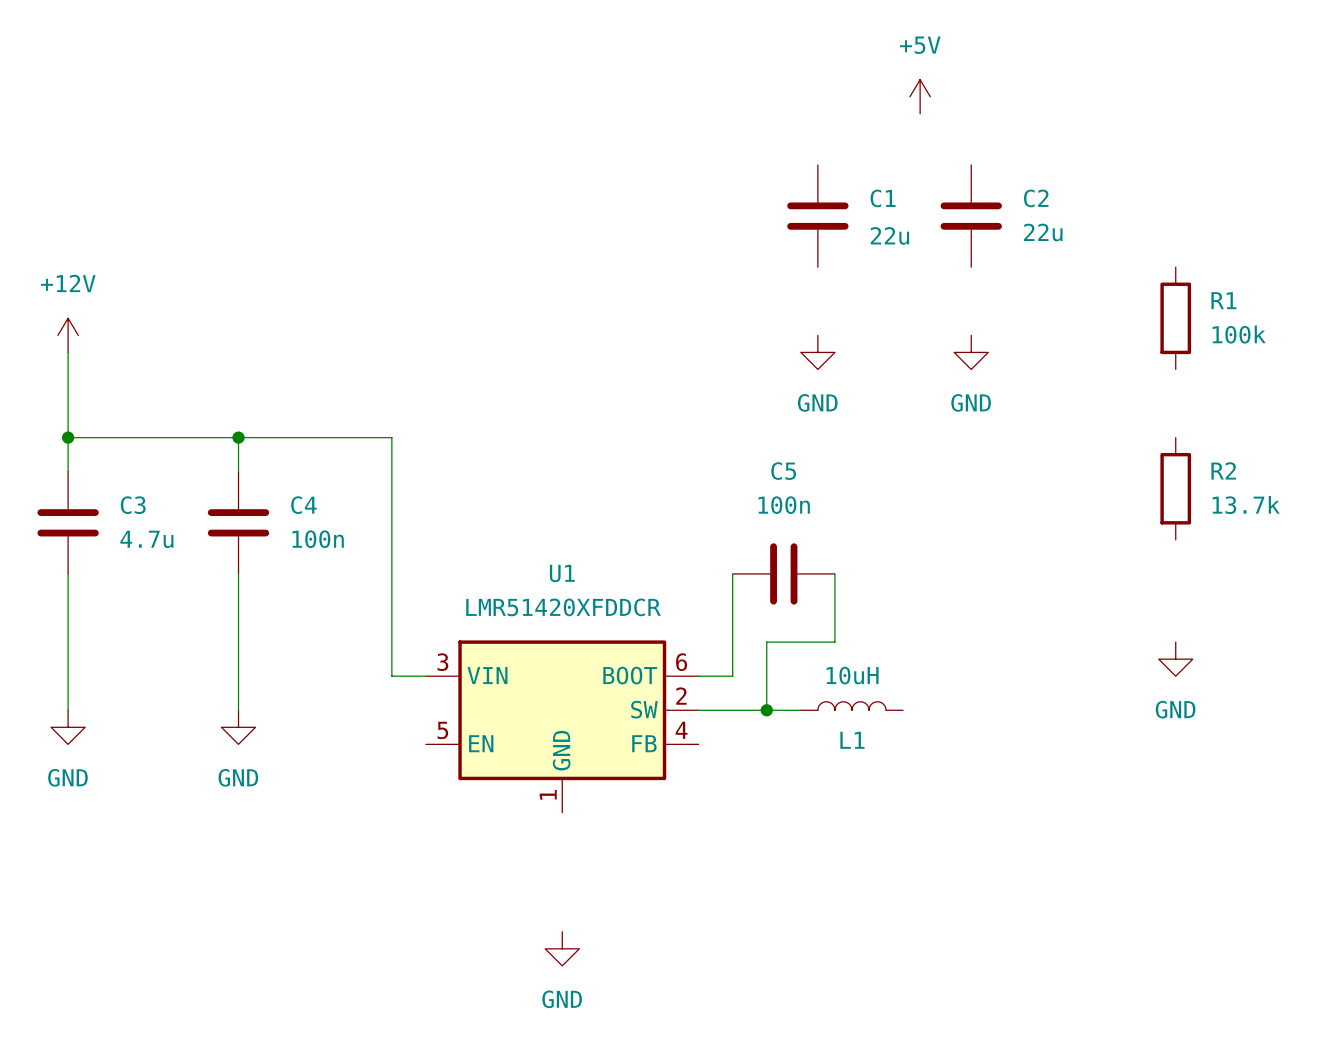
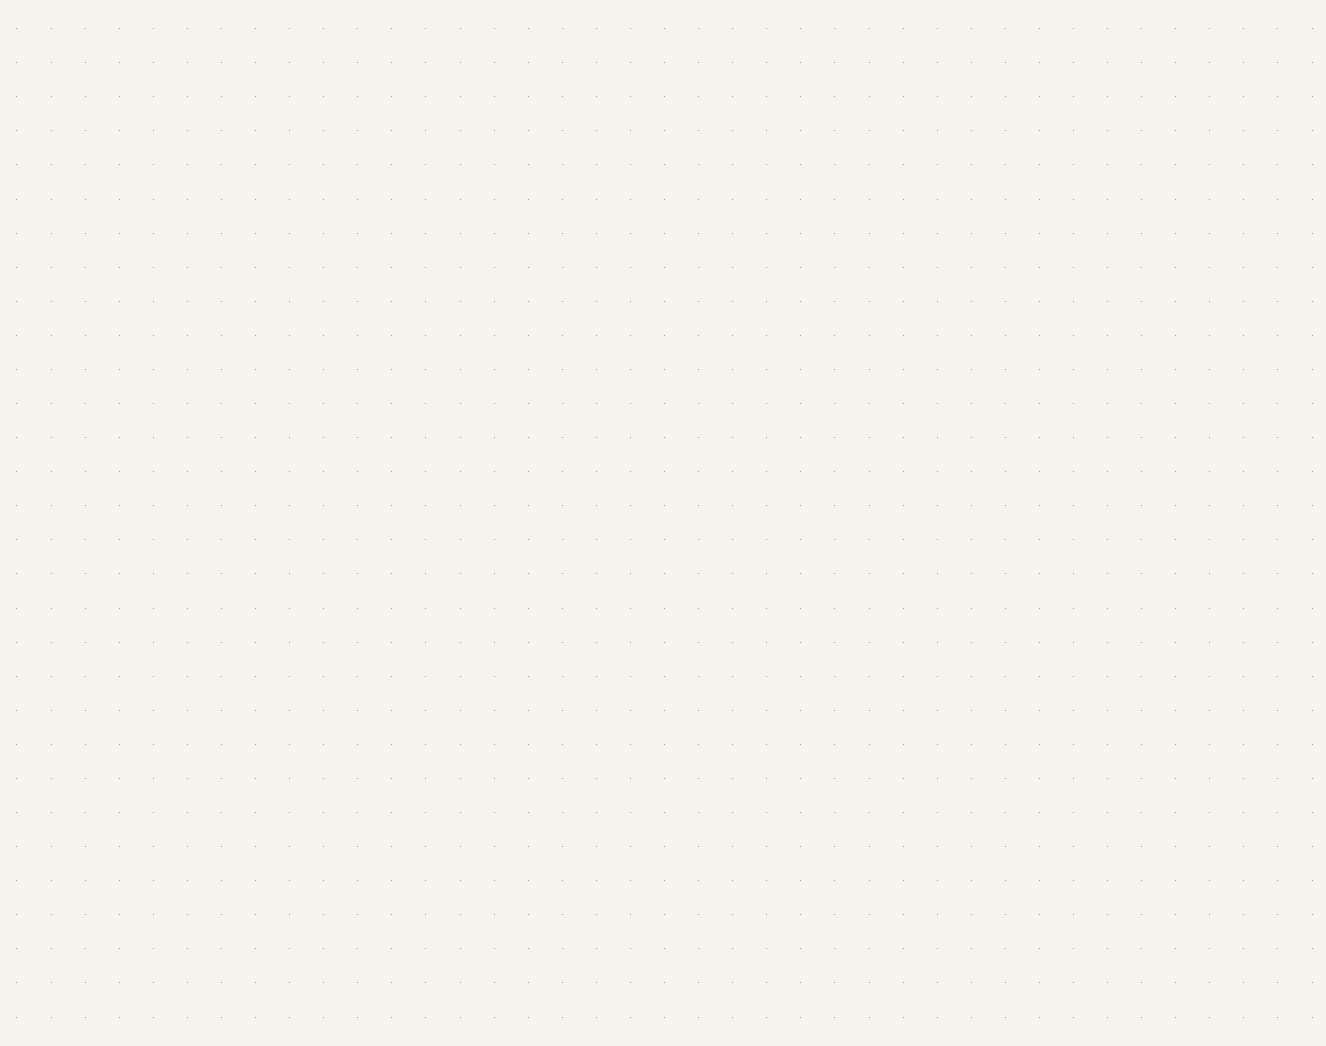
power symbol: +5V (920, 96) -> none
C1: 22u (817, 216) -> none
C2: 22u (971, 216) -> none
R1: 100k (1175, 318) -> none
power symbol: +12V (68, 335) -> none
wire: (68, 352) (68, 471) -> none
power symbol: GND (817, 352) -> none
power symbol: GND (971, 352) -> none
wire: (68, 437) (391, 437) (391, 676) (425, 676) -> none
junction: (68, 437) -> none
wire: (238, 437) (238, 471) -> none
junction: (238, 437) -> none
R2: 13.7k (1175, 488) -> none
C3: 4.7u (68, 522) -> none
C4: 100n (238, 522) -> none
wire: (68, 573) (68, 710) -> none
wire: (238, 573) (238, 710) -> none
wire: (732, 573) (732, 676) (698, 676) -> none
C5: 100n (783, 573) -> none
wire: (834, 573) (834, 642) (766, 642) (766, 710) -> none
power symbol: GND (1175, 659) -> none
L1: 10uH (851, 706) -> none
wire: (698, 710) (800, 710) -> none
junction: (766, 710) -> none
U1: LMR51420XFDDCR (562, 726) -> none
power symbol: GND (68, 727) -> none
power symbol: GND (238, 727) -> none
power symbol: GND (562, 948) -> none

